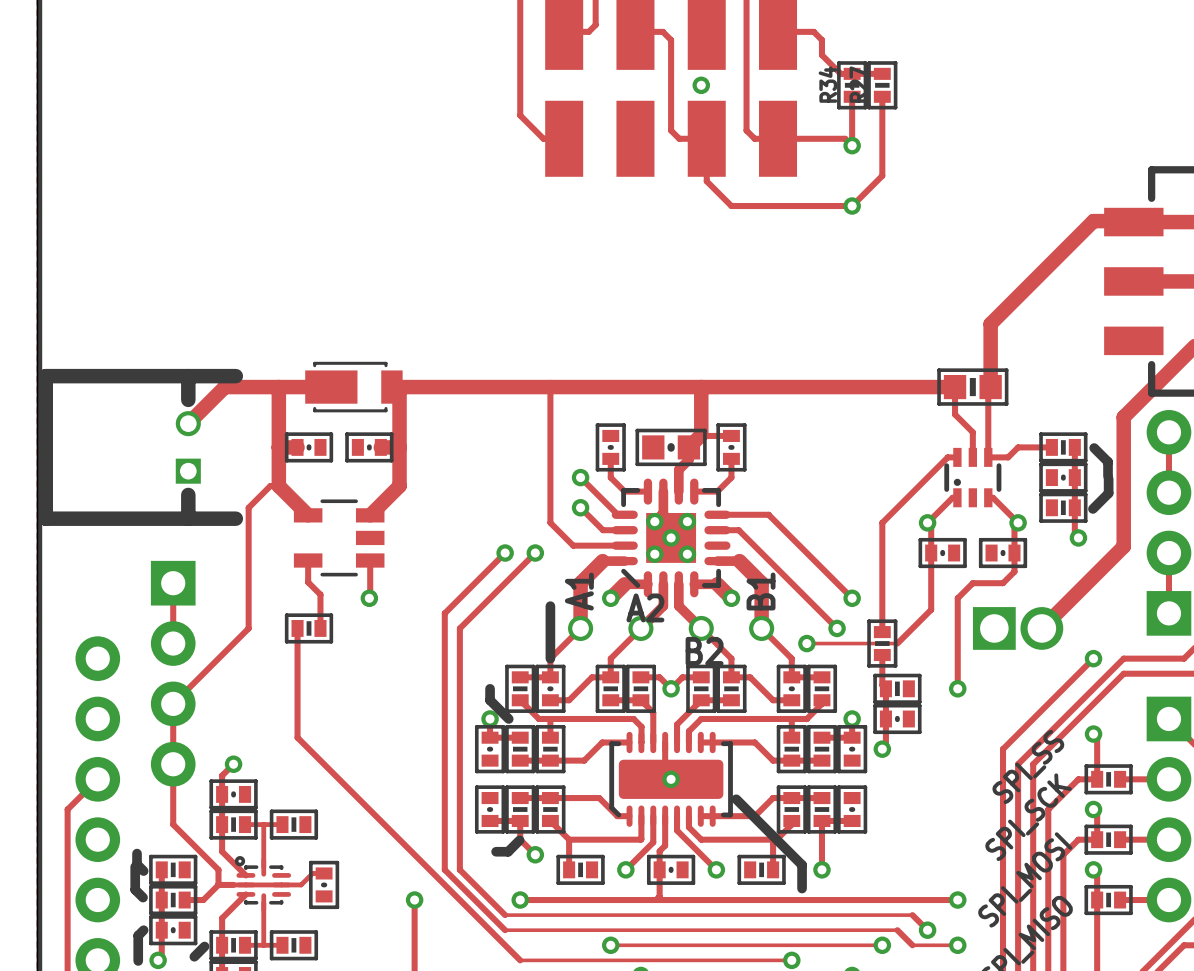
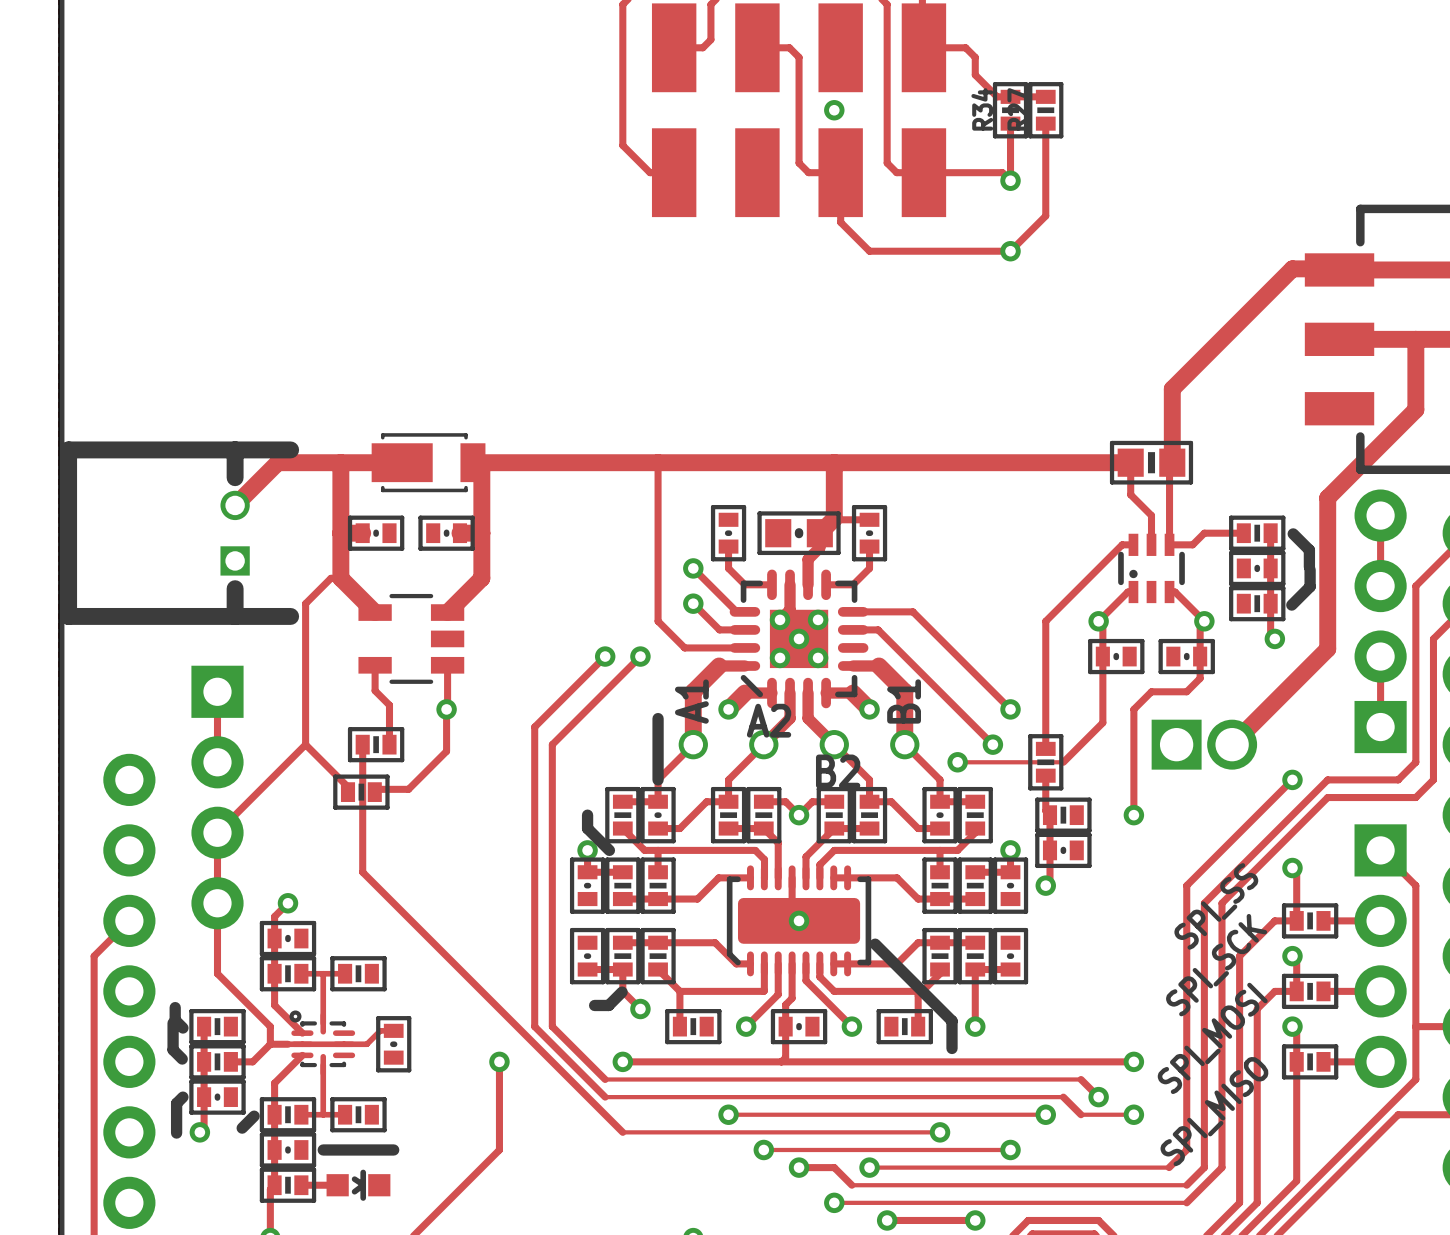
track: none -> (446, 709) (446, 751) (408, 789) (377, 789) (374, 792)
track: none -> (305, 744) (347, 787) (347, 792)
part: none -> (361, 792)

